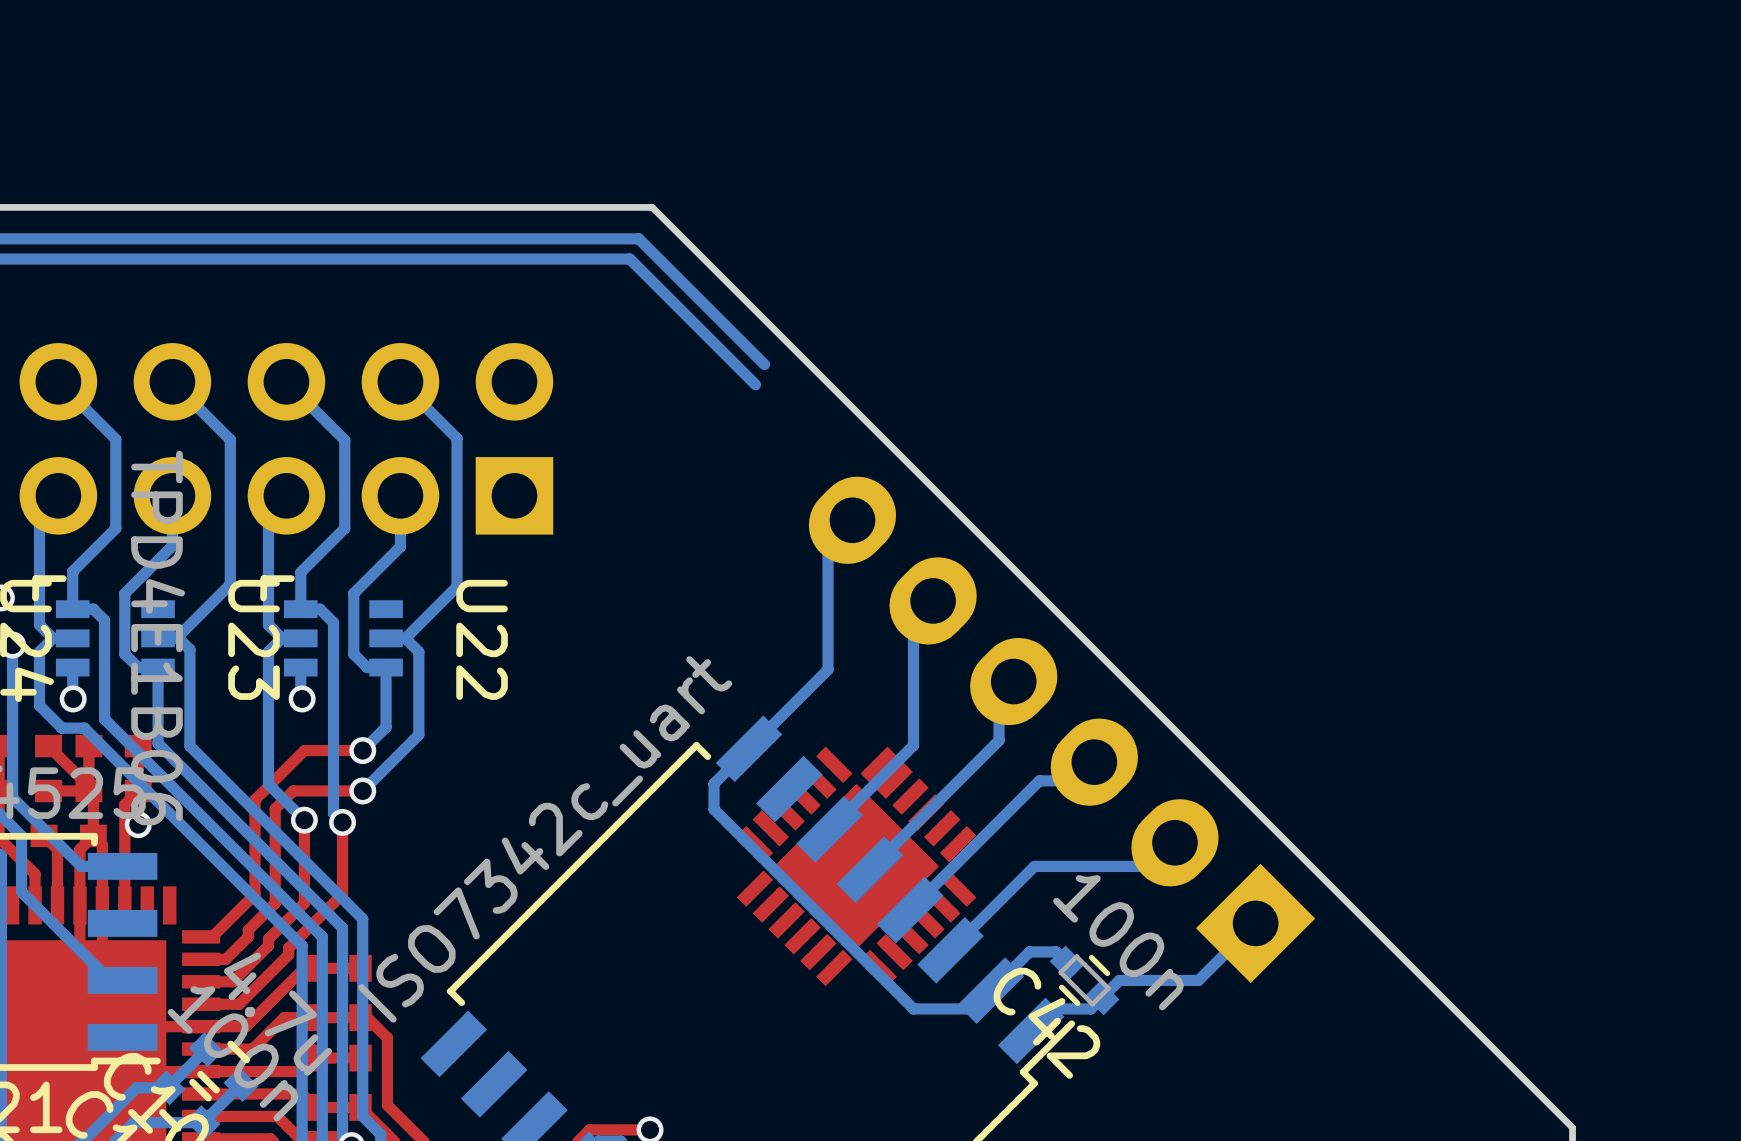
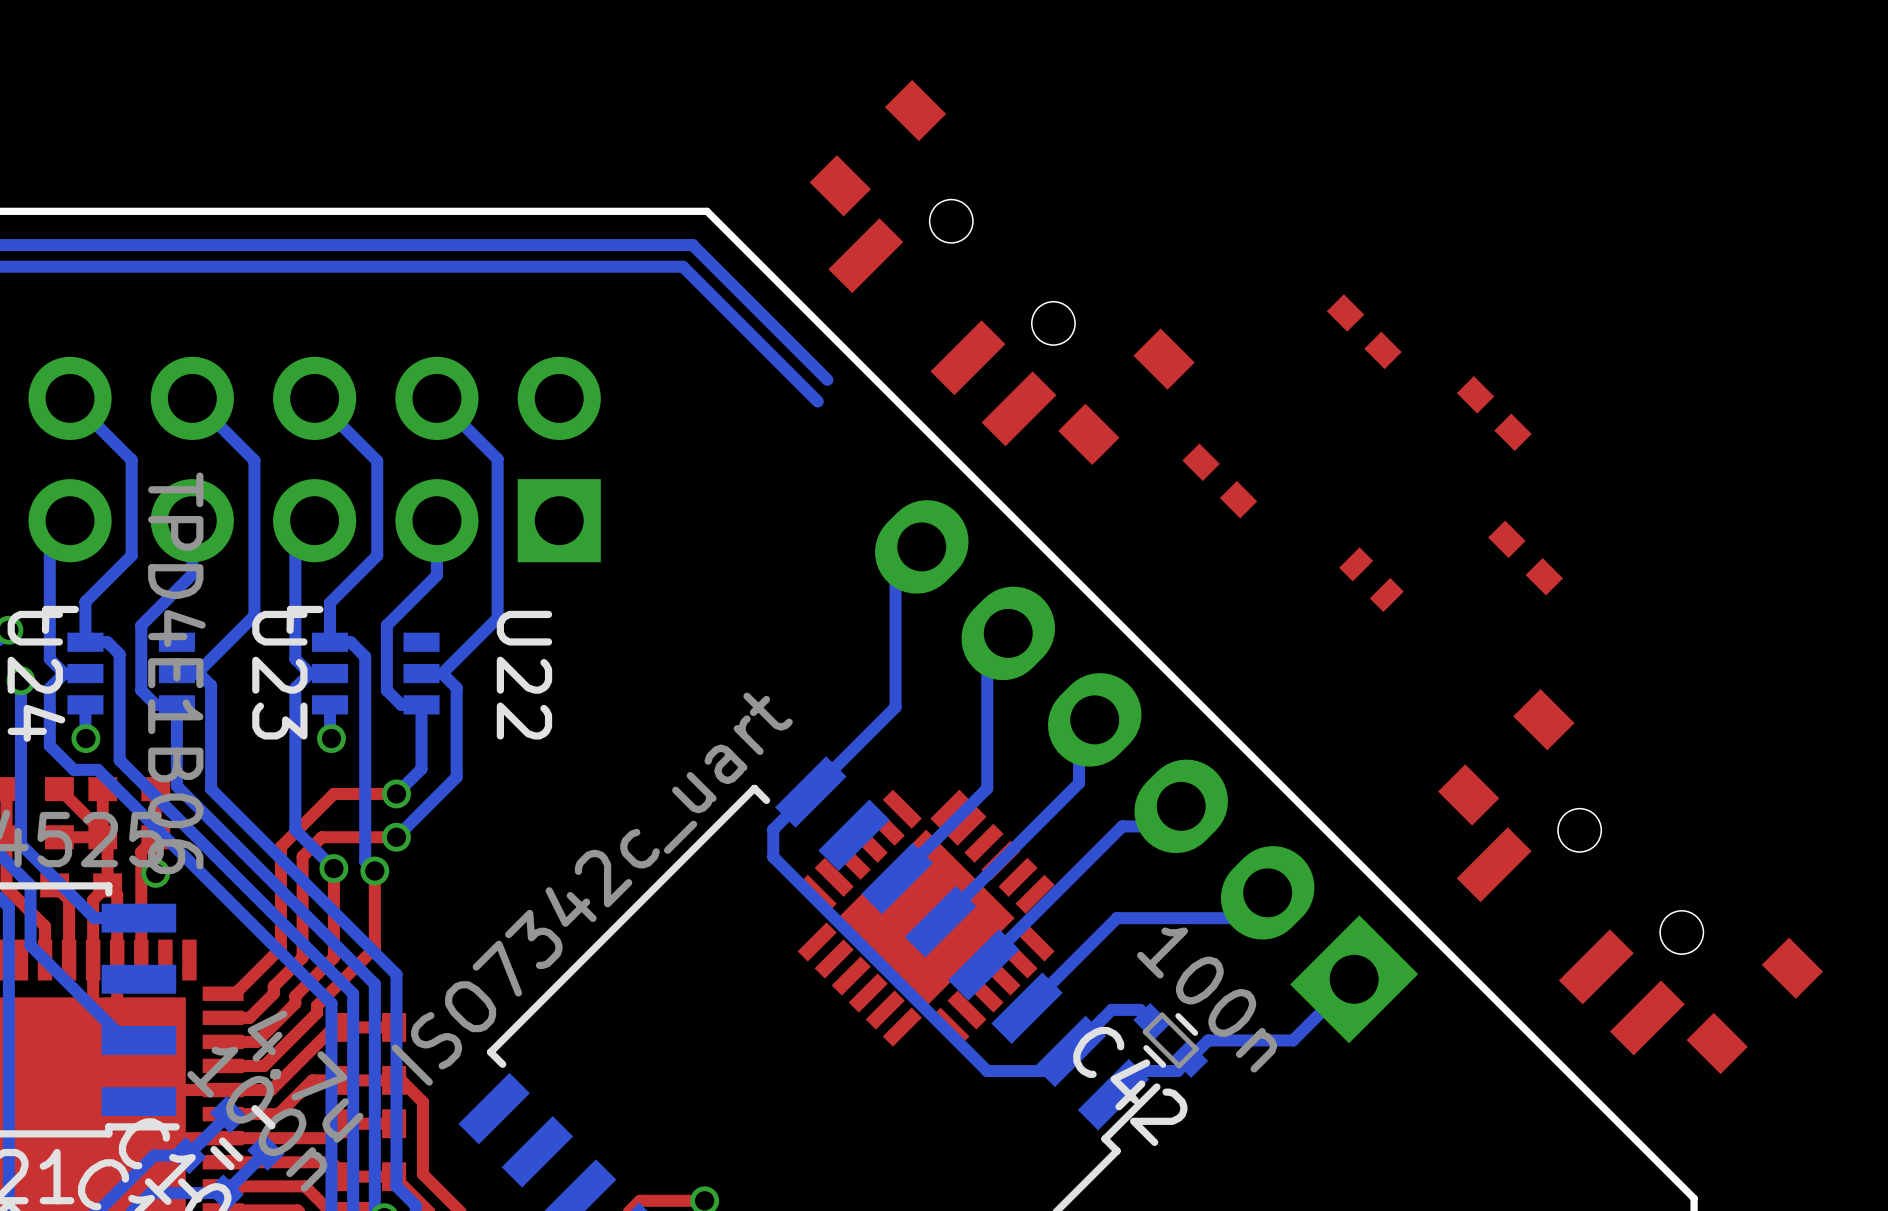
part: none -> (1002, 272)
part: none -> (1364, 331)
part: none -> (1494, 413)
part: none -> (1219, 480)
part: none -> (1525, 558)
part: none -> (1371, 579)
part: none -> (1630, 881)

